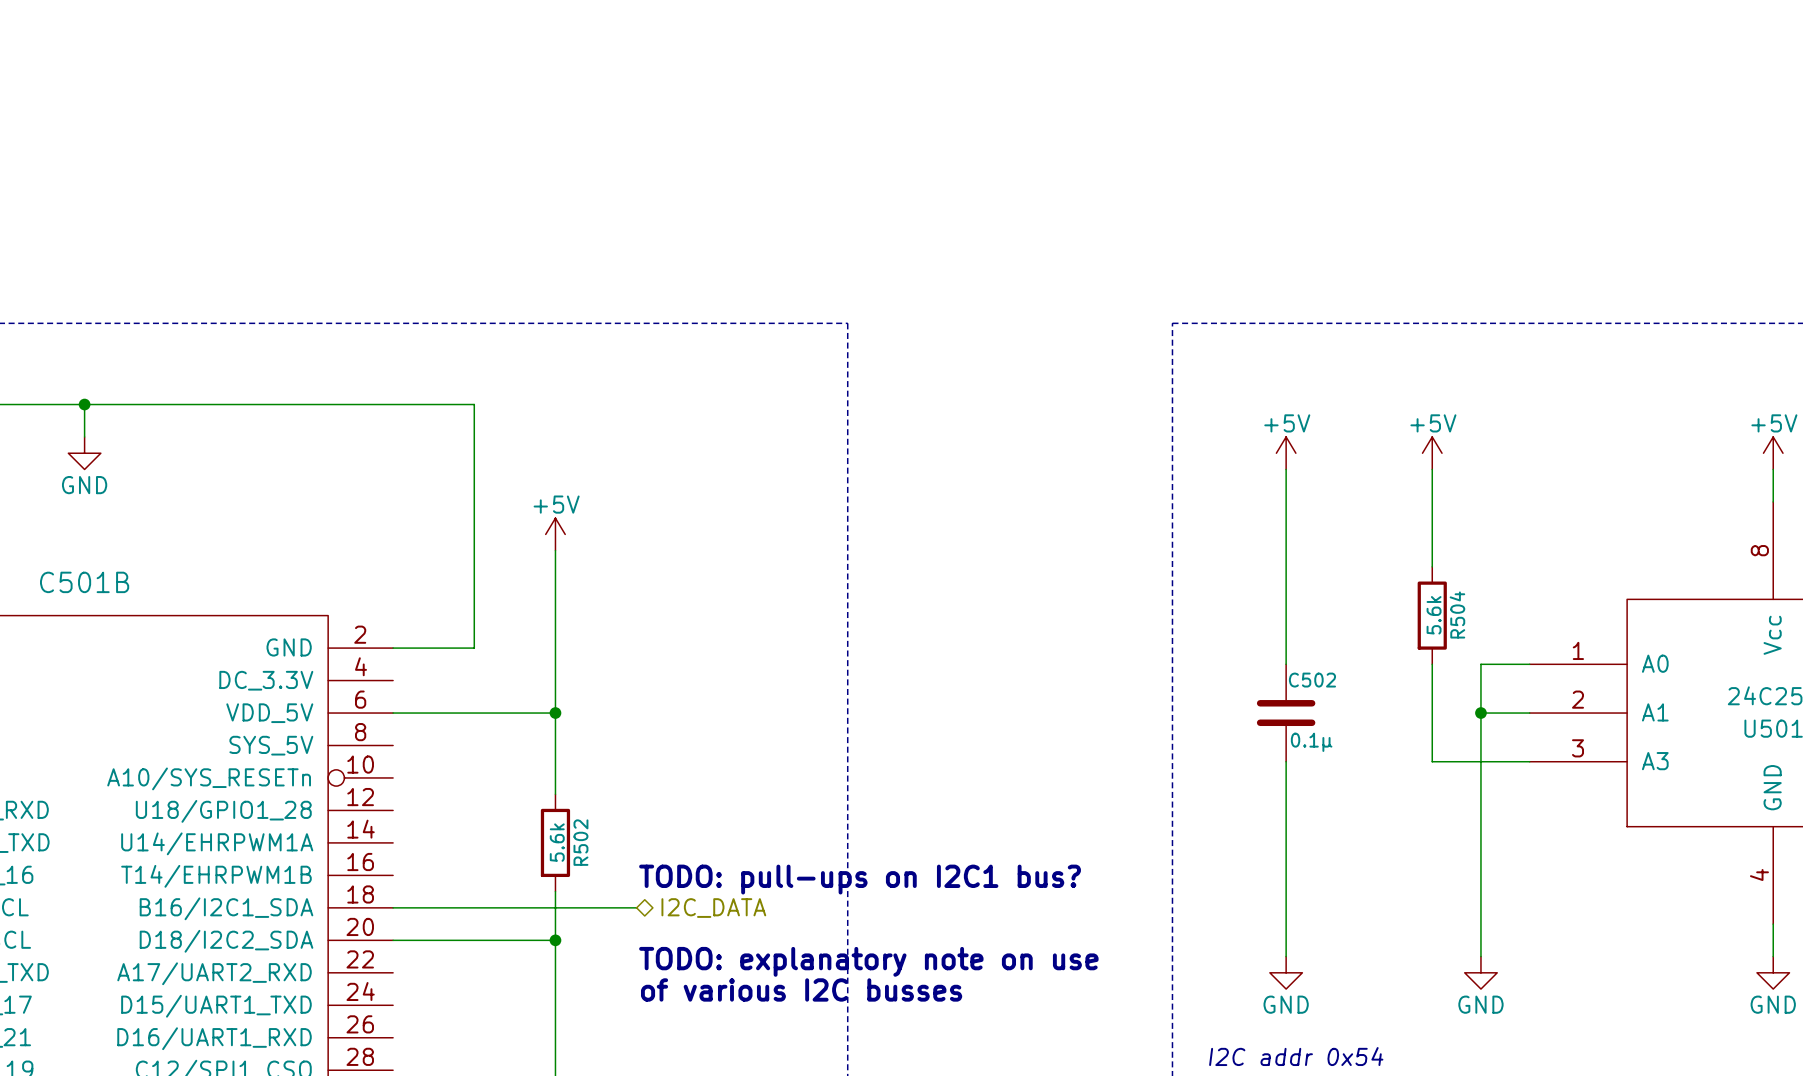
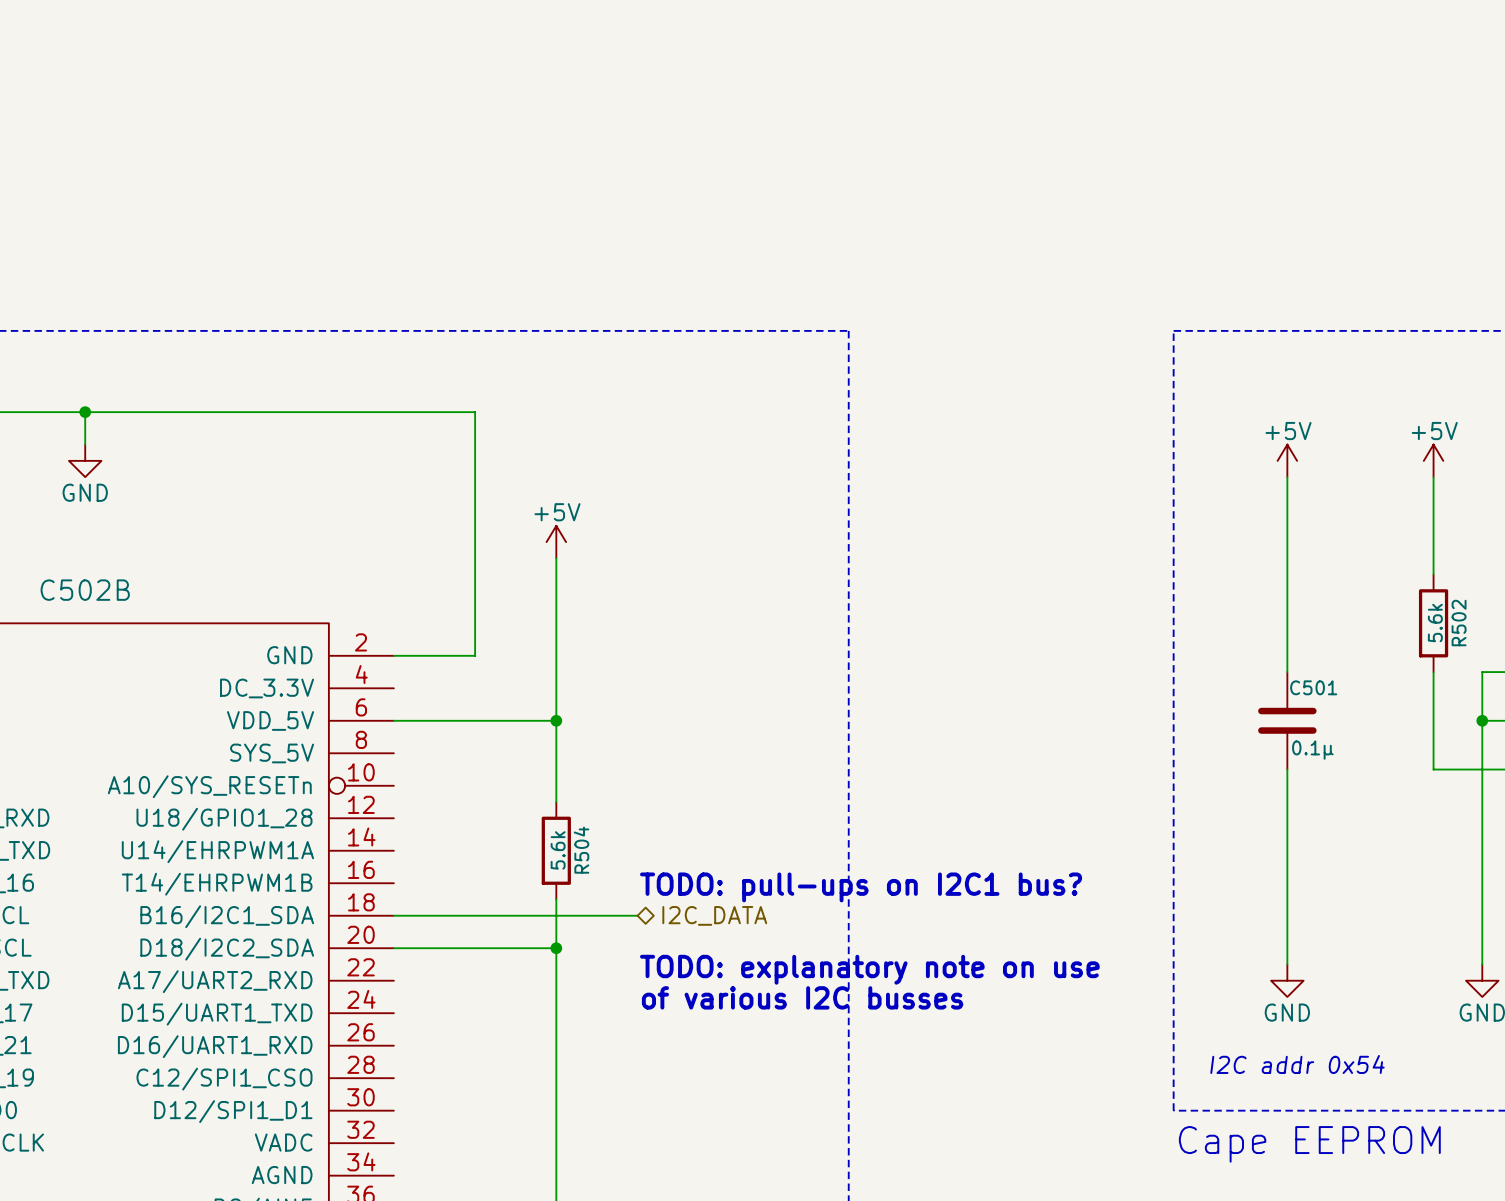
C501B name: C501B (84, 582) -> C502B (85, 590)
R504 name: R504 (1457, 614) -> R502 (1459, 623)
C502 name: C502 (1312, 680) -> C501 (1313, 687)
R502 name: R502 (580, 842) -> R504 (581, 850)

